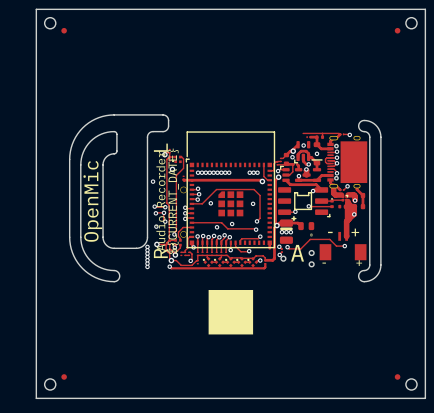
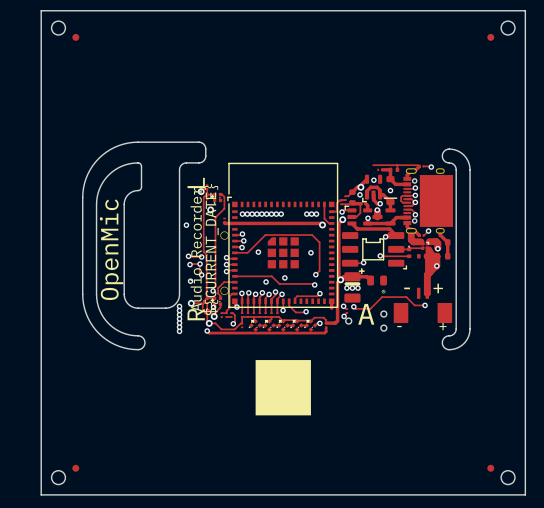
part footprint: [171, 155, 182, 164] -> [210, 192, 223, 204]
part footprint: [171, 239, 182, 247] -> [210, 296, 223, 308]
part footprint: [202, 257, 214, 268] -> [248, 319, 263, 332]
part footprint: [213, 257, 225, 268] -> [262, 319, 276, 332]
part footprint: [225, 257, 236, 268] -> [276, 319, 290, 332]
part footprint: [236, 257, 248, 268] -> [290, 319, 304, 332]
part footprint: [247, 257, 259, 268] -> [304, 319, 318, 332]

